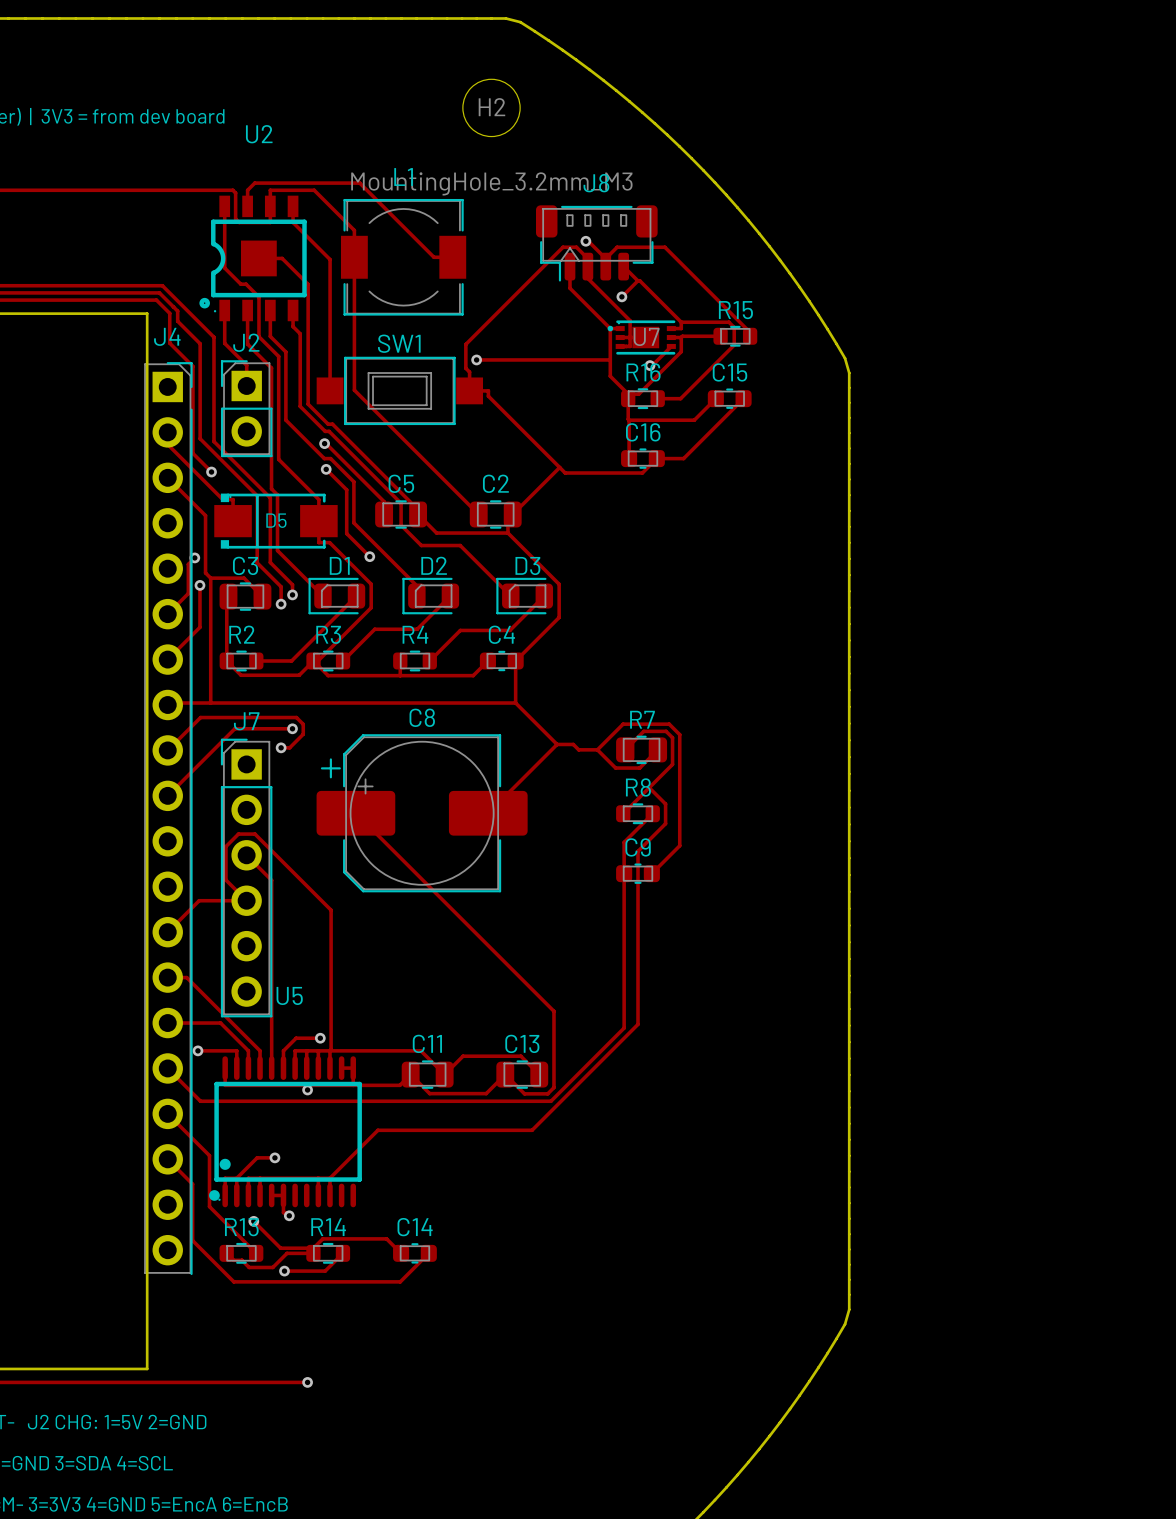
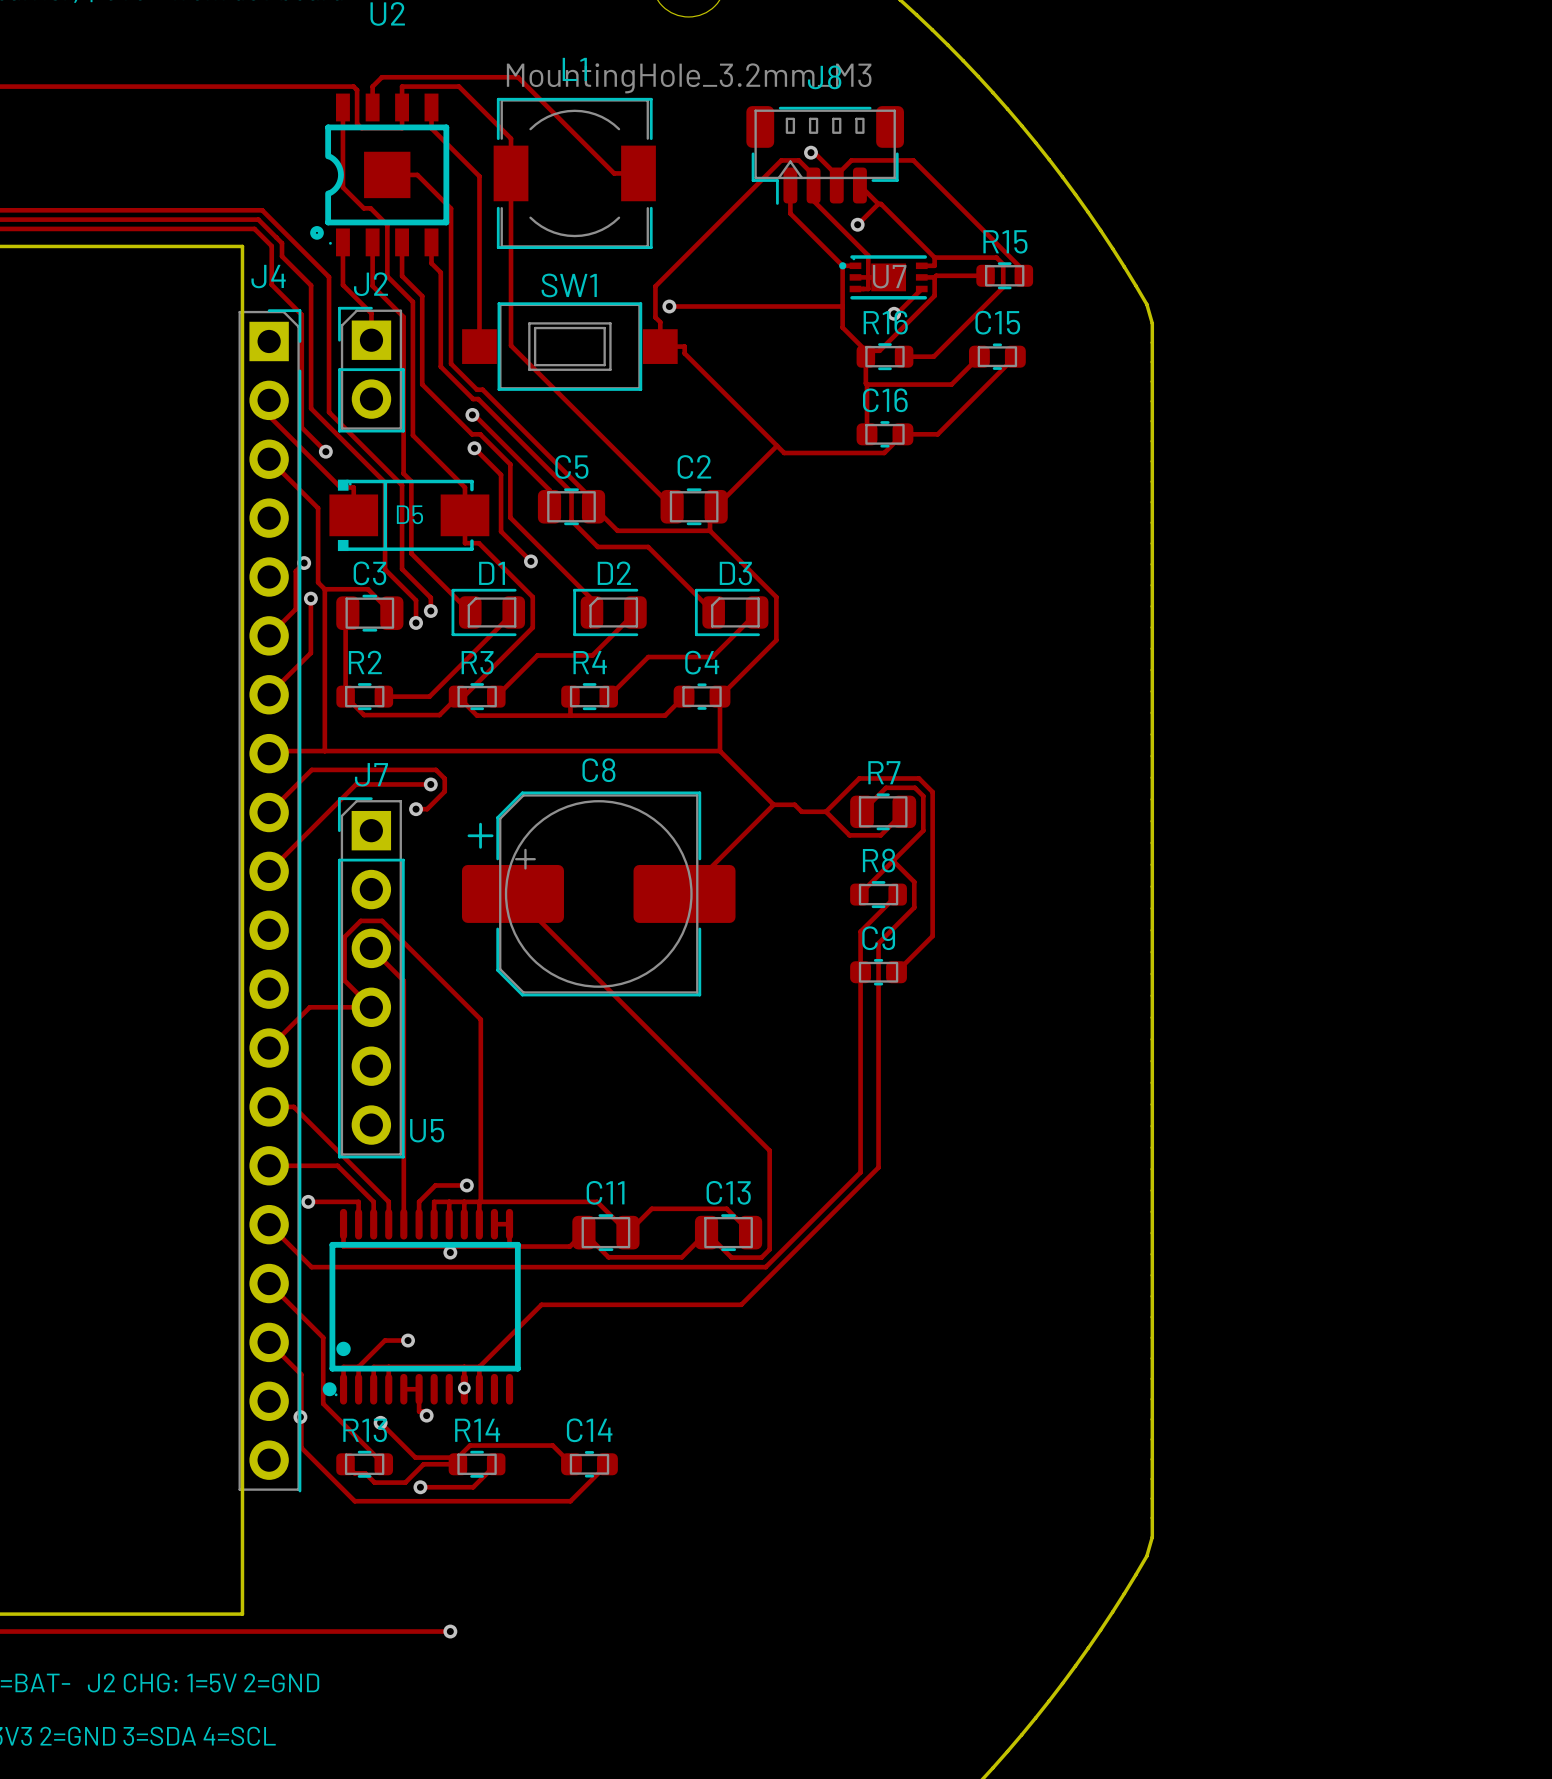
via: none -> (464, 1388)
via: none -> (300, 1417)

